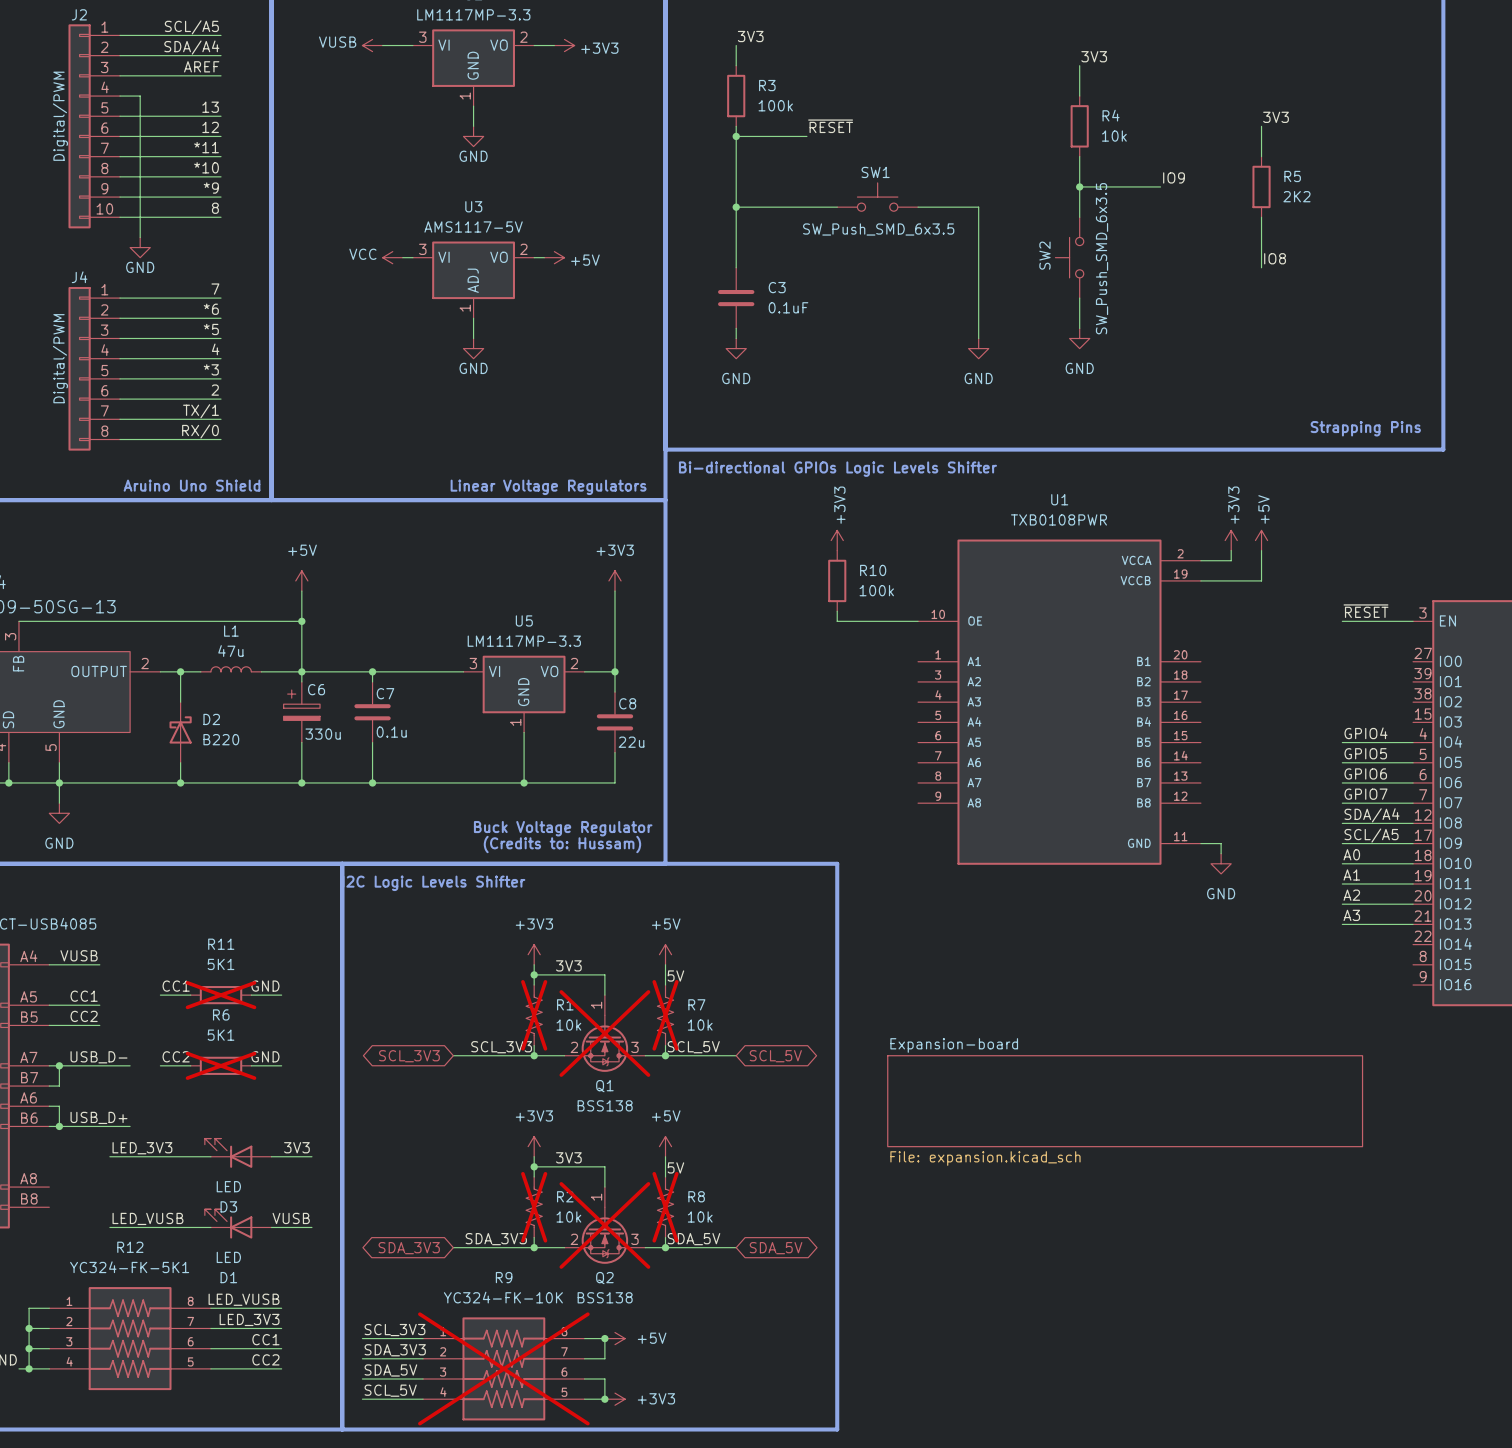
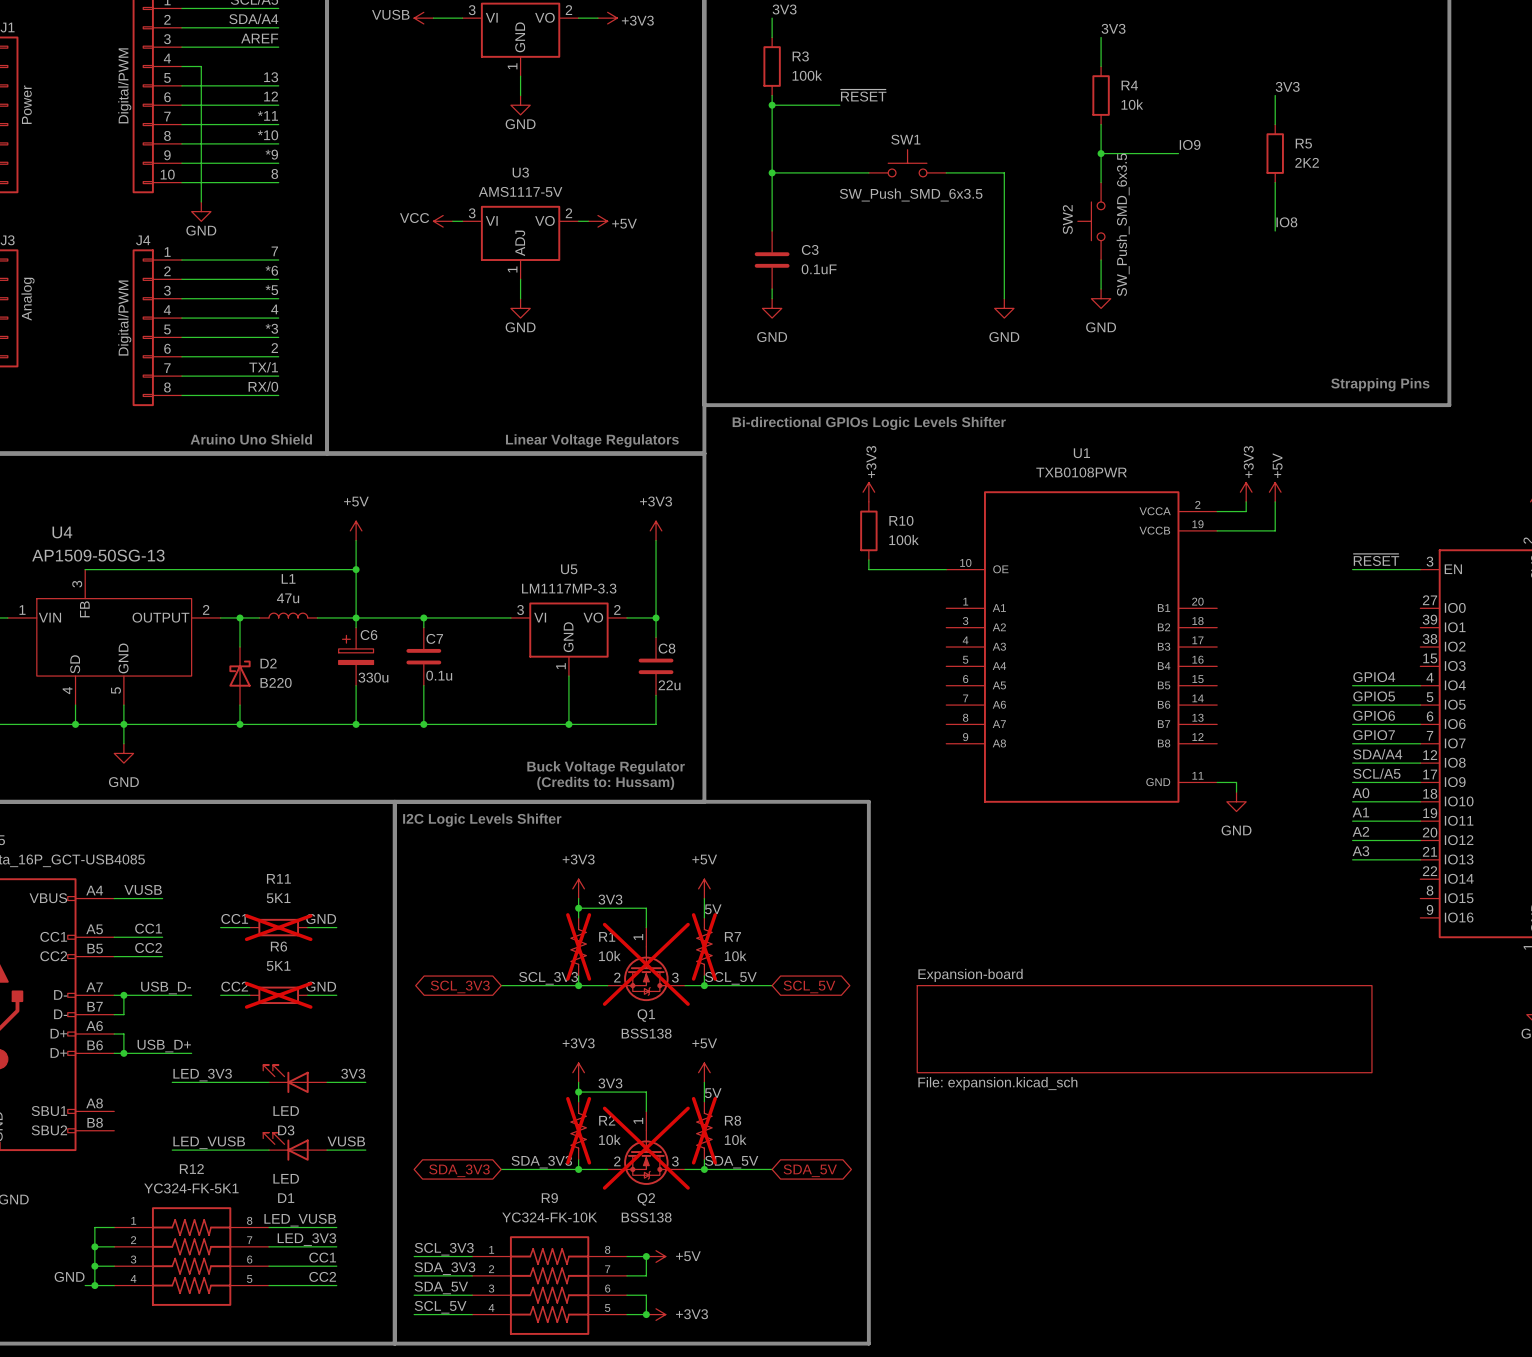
R9 do-not-place cross: (503, 1368) -> none

